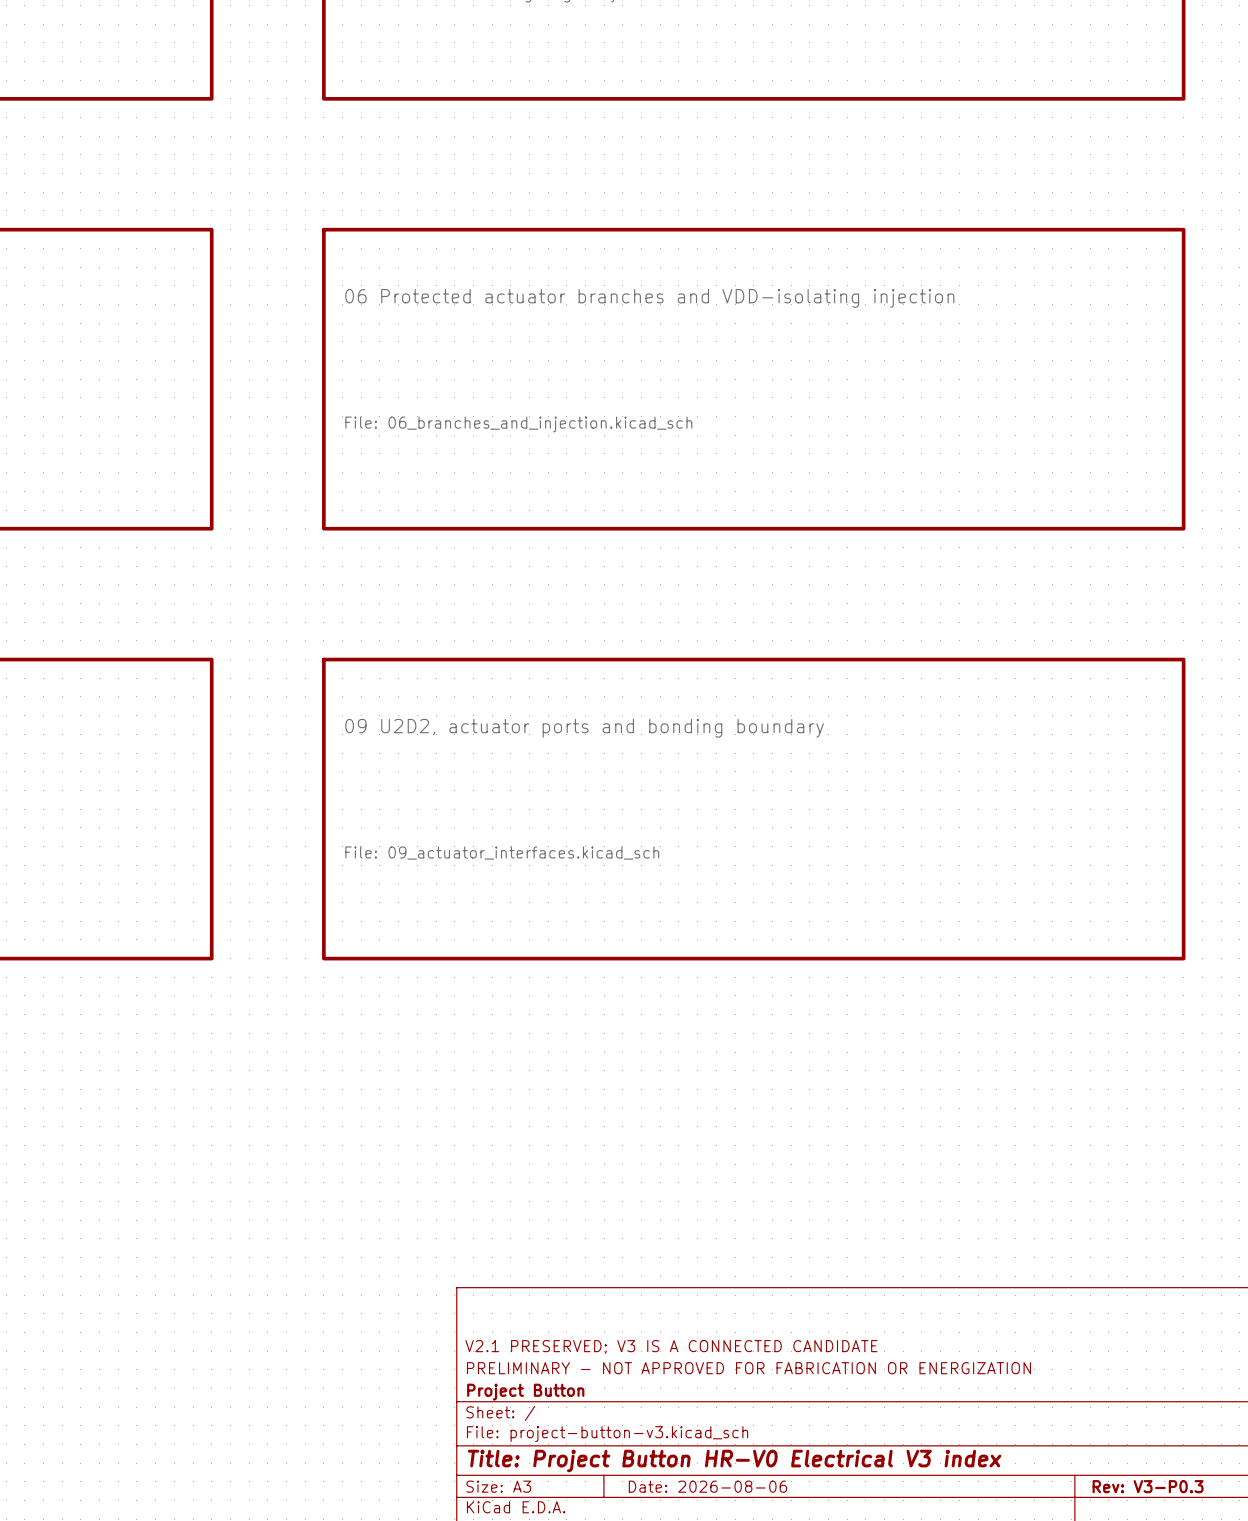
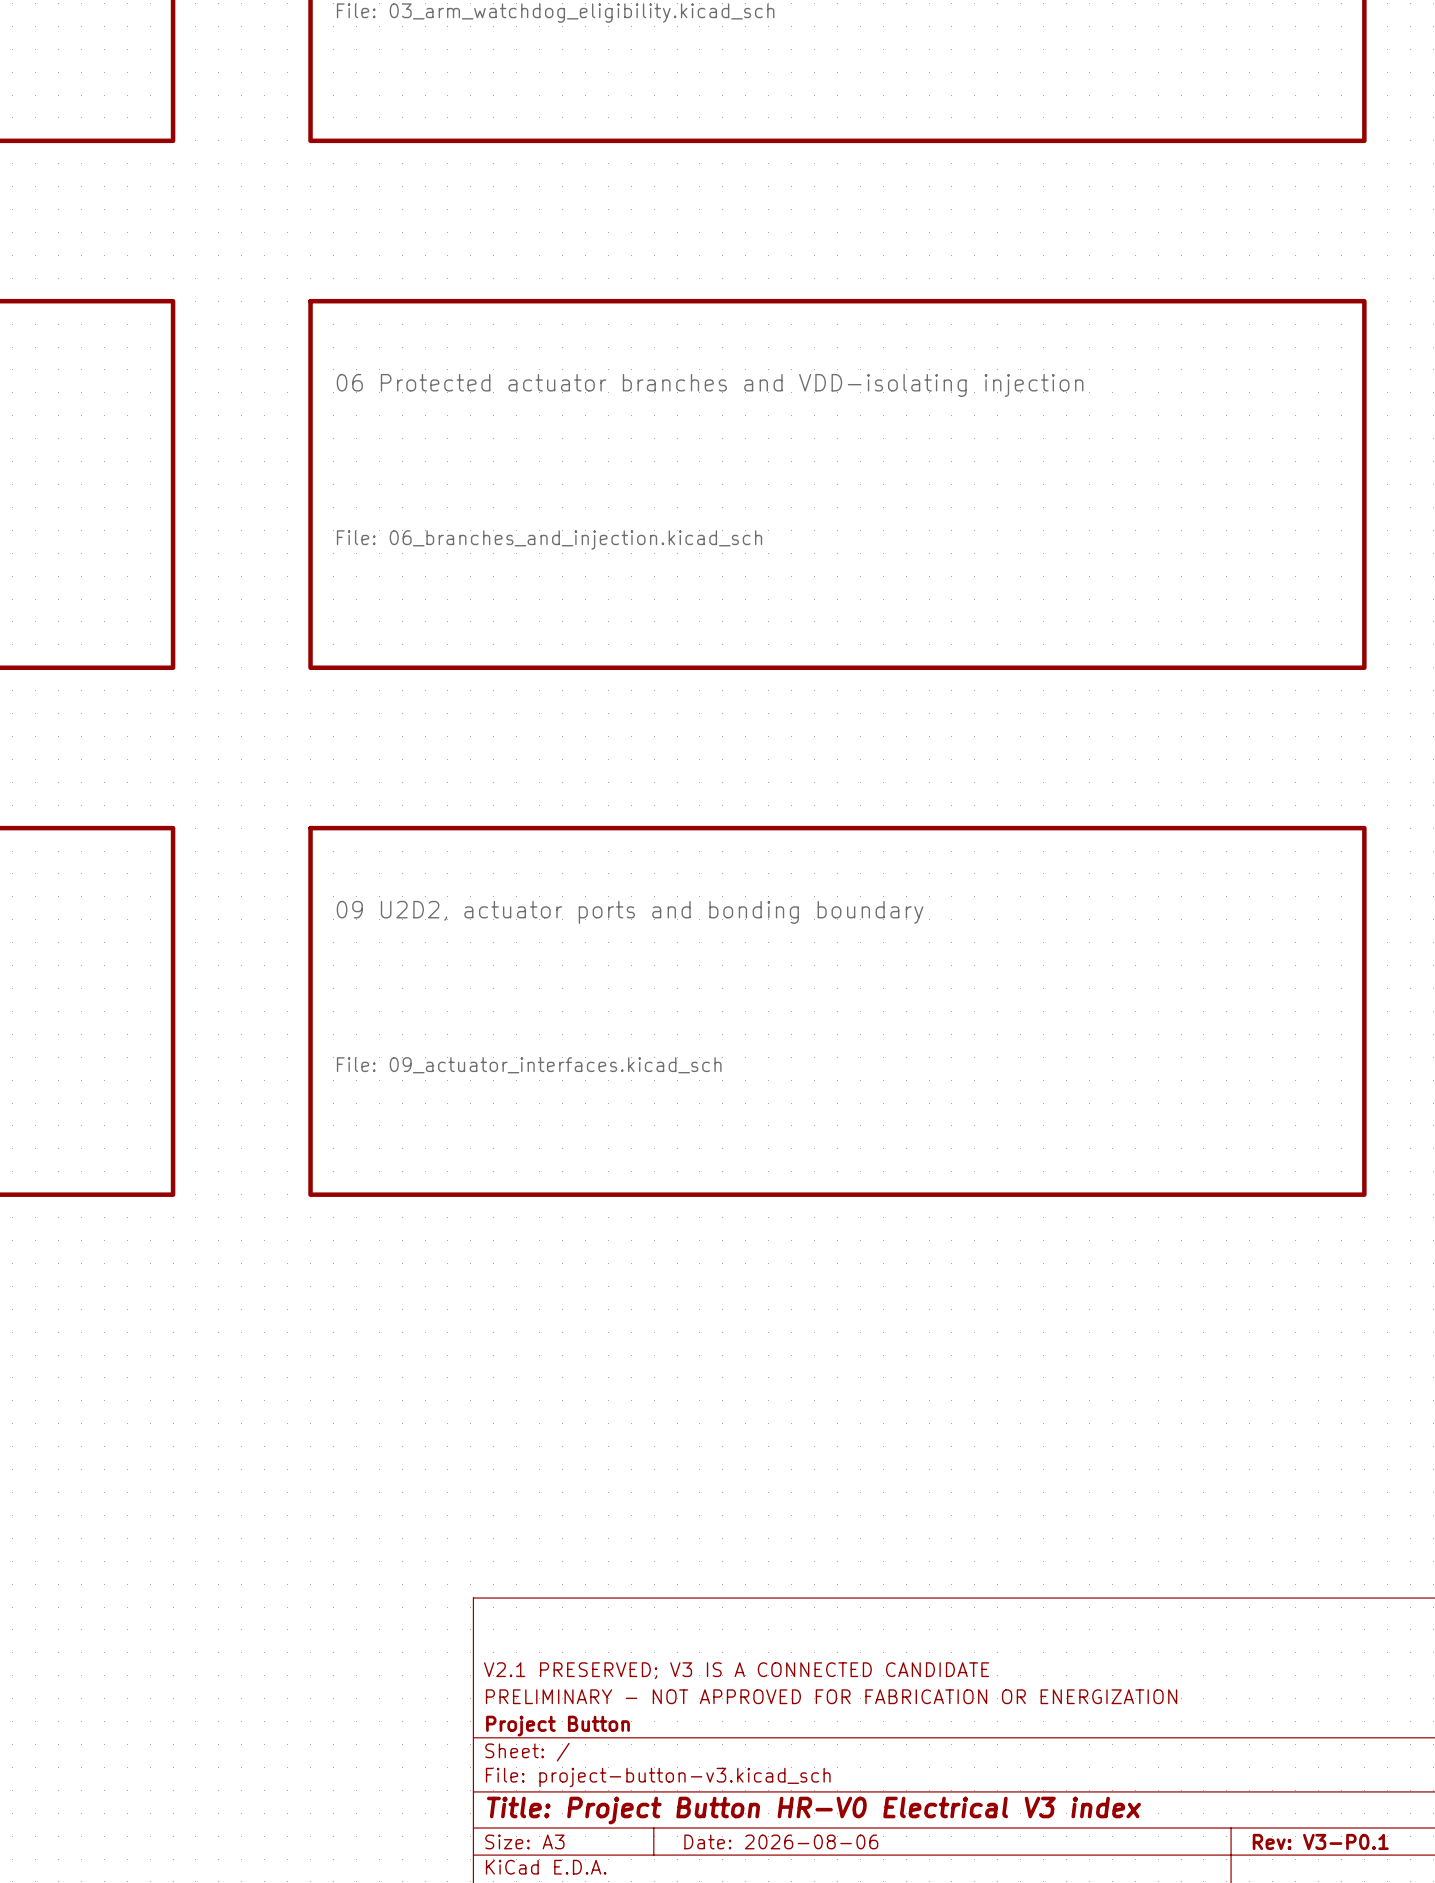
title block: Rev: V3-P0.3 (1148, 1486) -> Rev: V3-P0.1 (1320, 1841)

